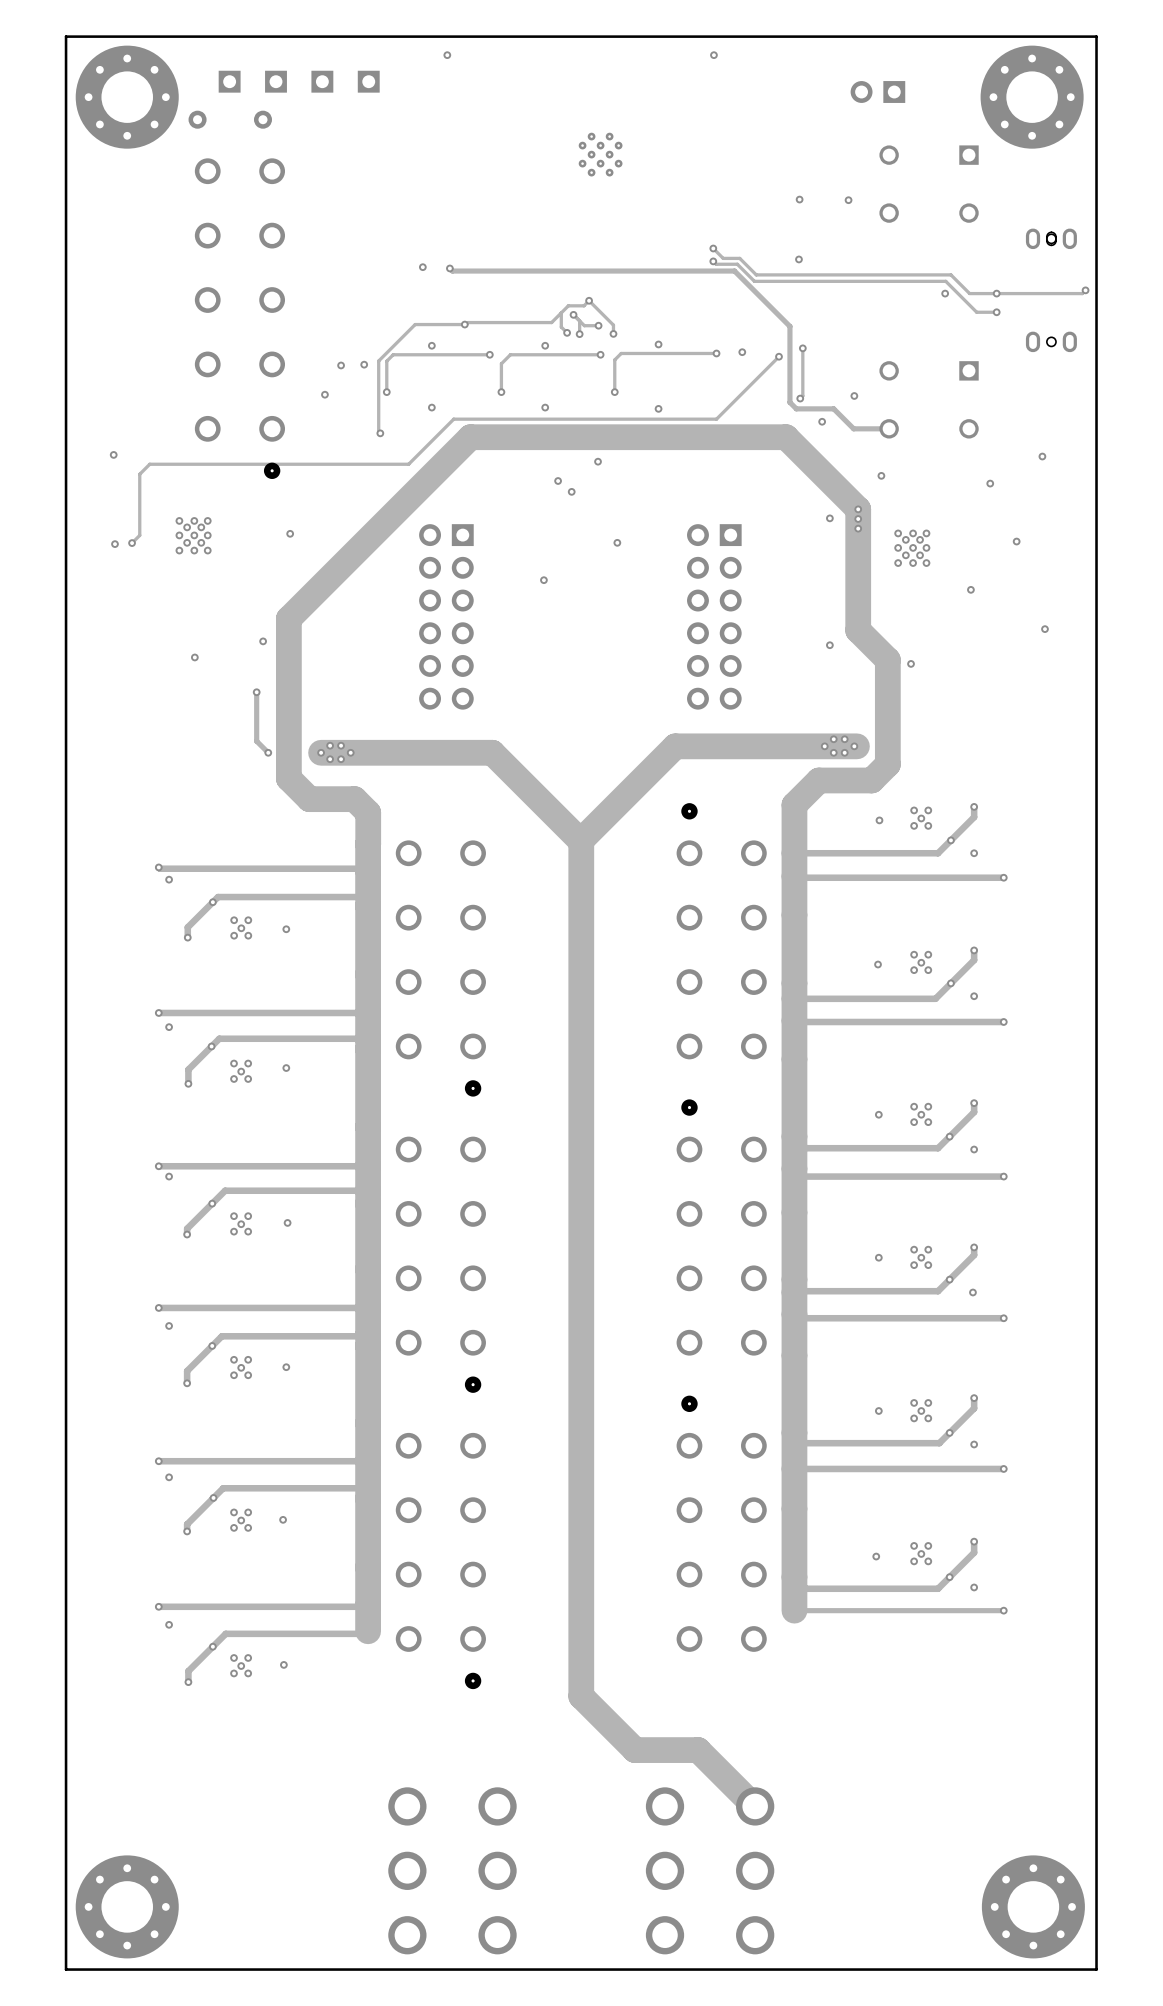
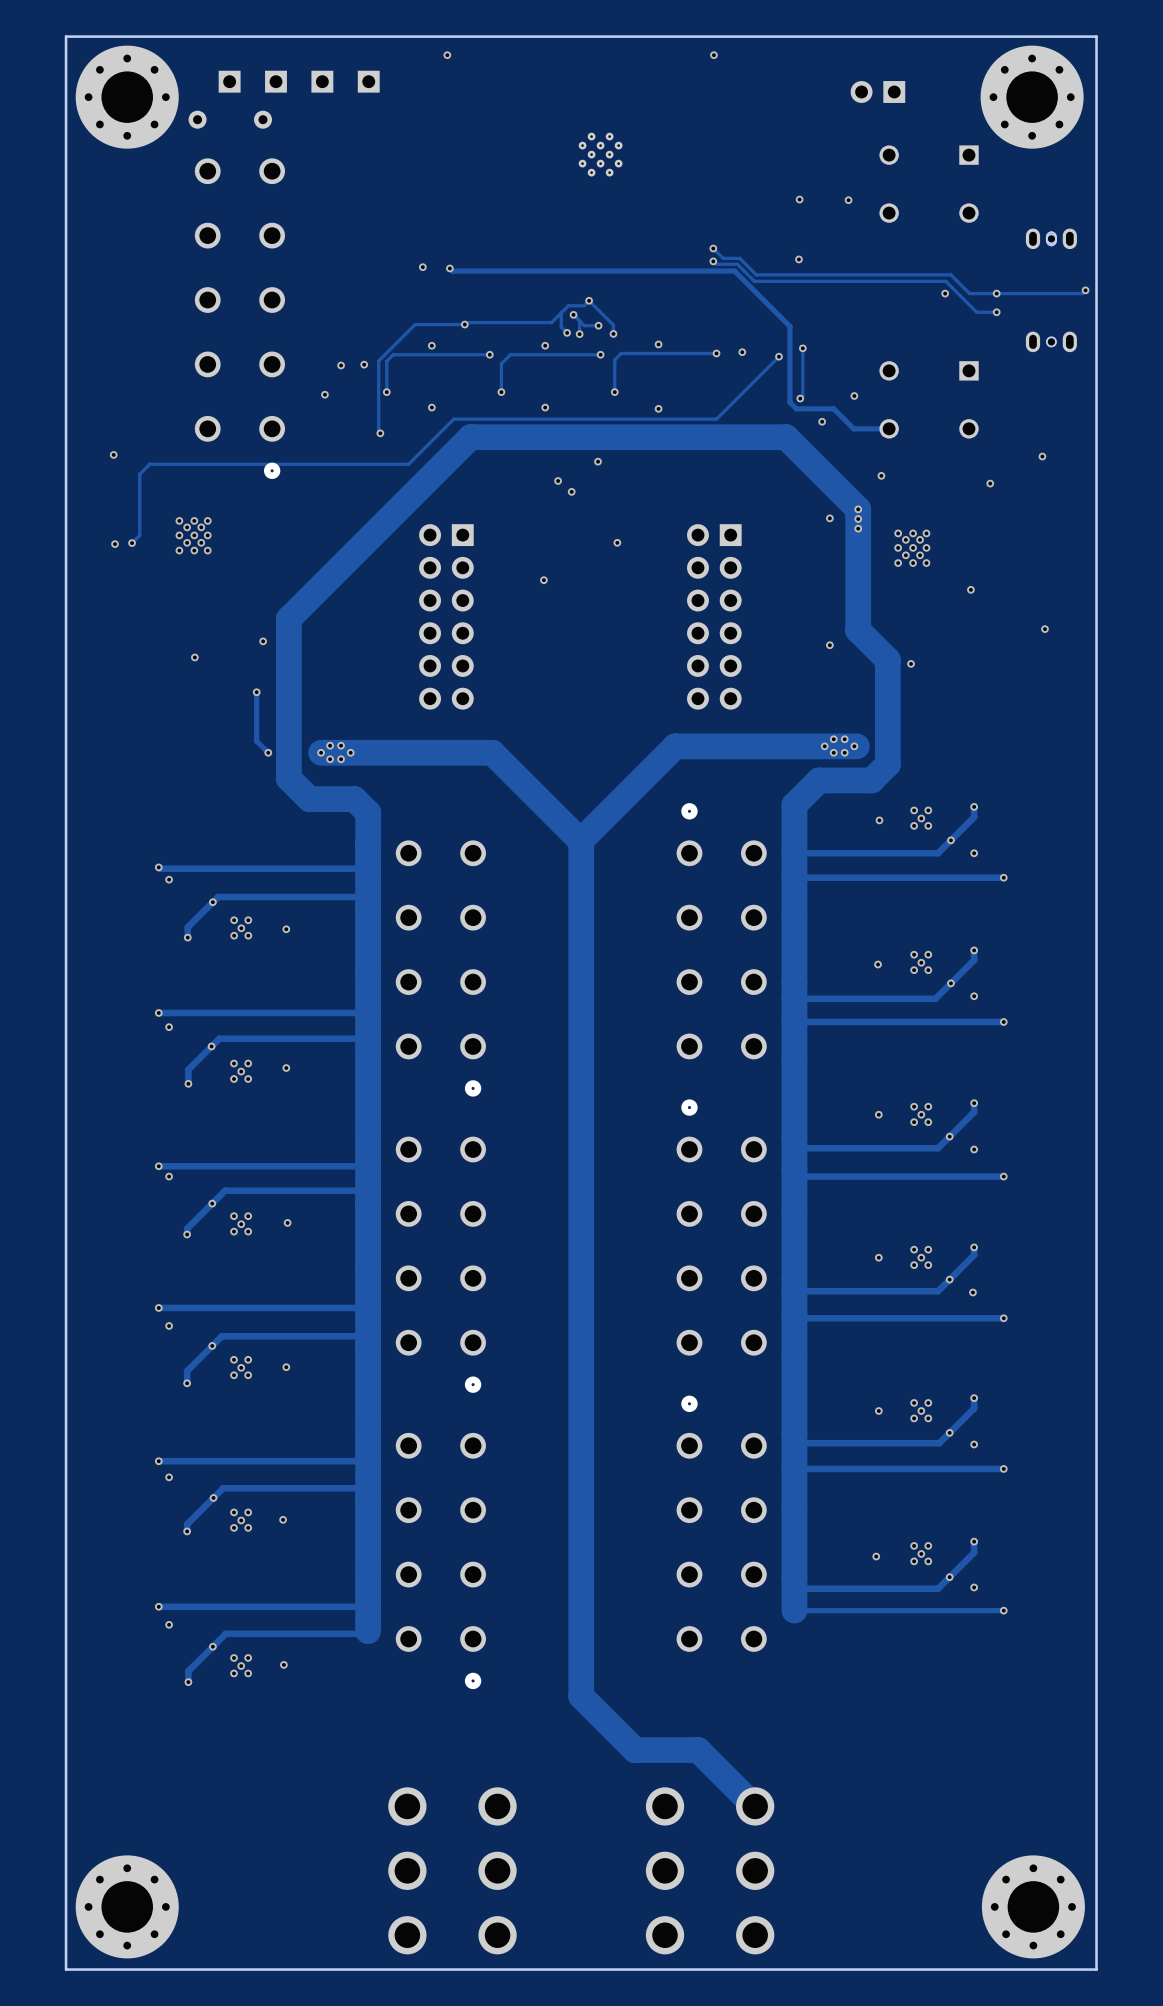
via: (290, 533) -> none
via: (1016, 541) -> none

